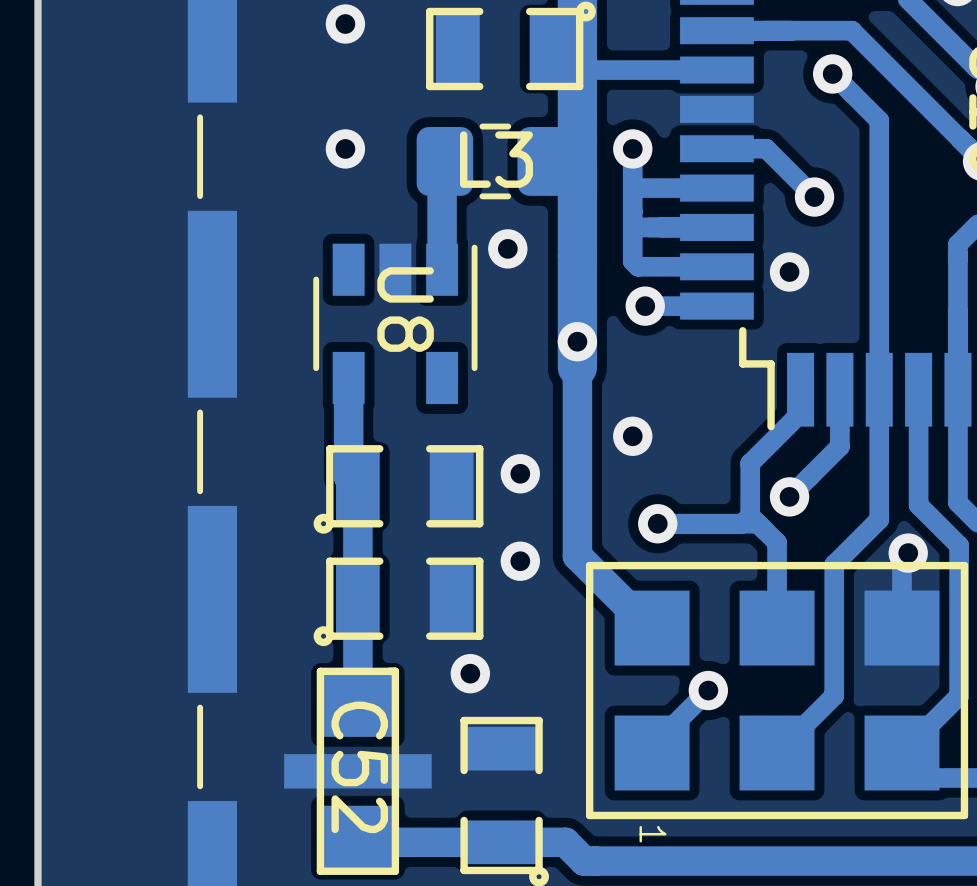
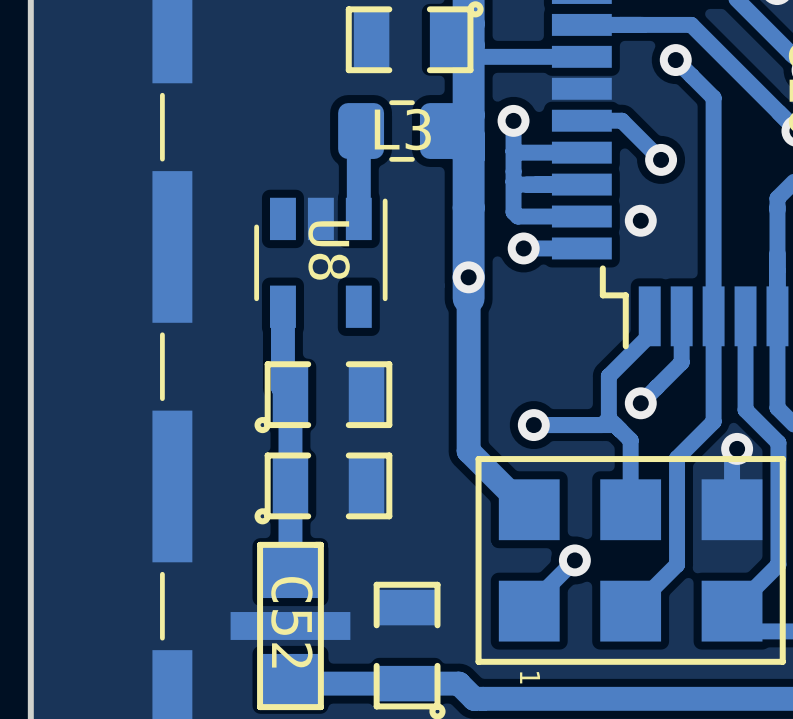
via: (345, 24) -> none
via: (345, 148) -> none
via: (507, 248) -> none
via: (632, 436) -> none
via: (520, 473) -> none
via: (520, 561) -> none
via: (470, 673) -> none

